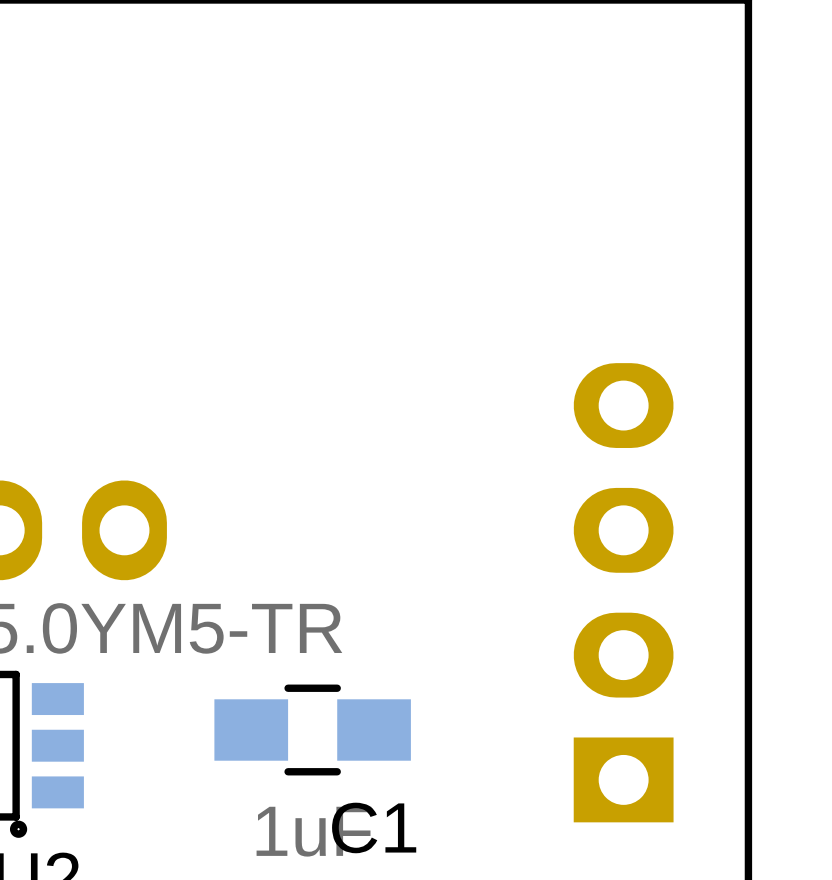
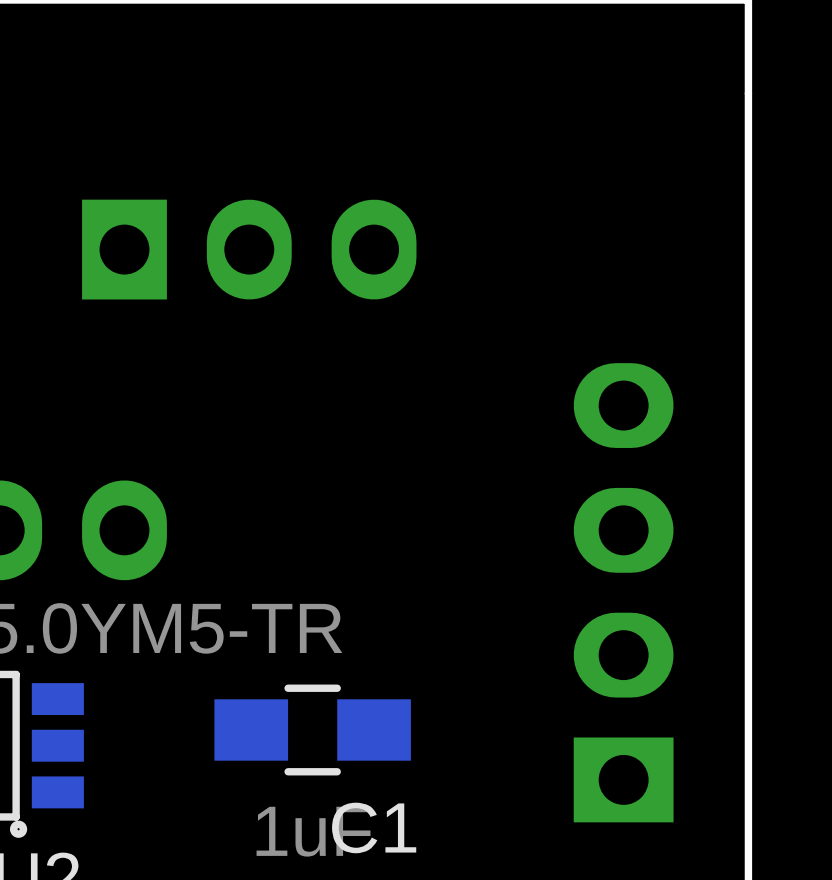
part: none -> (249, 249)

